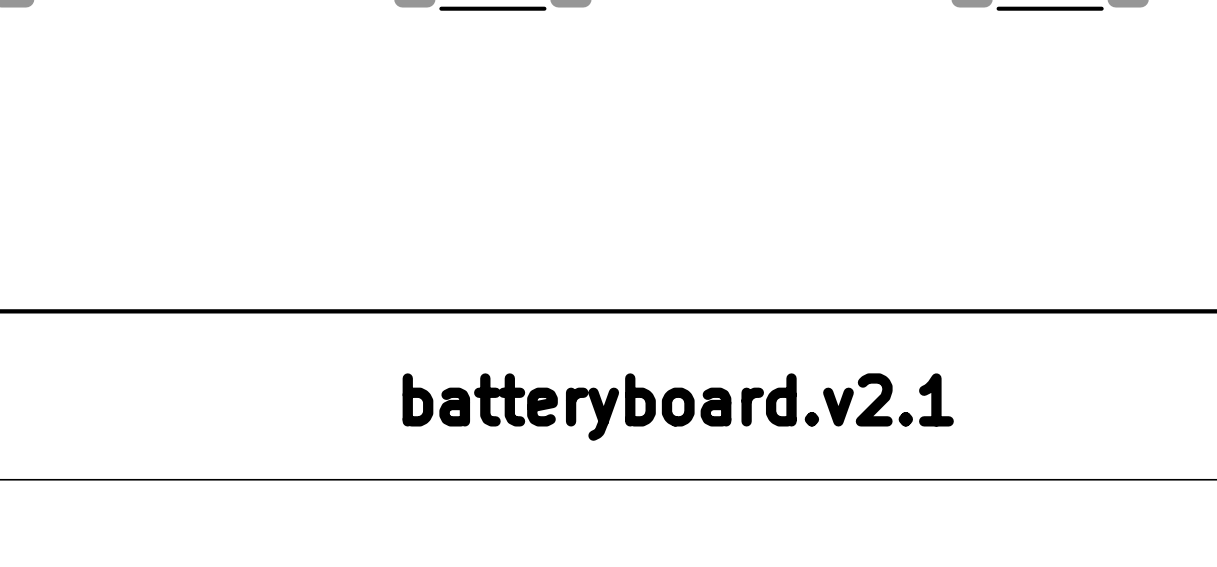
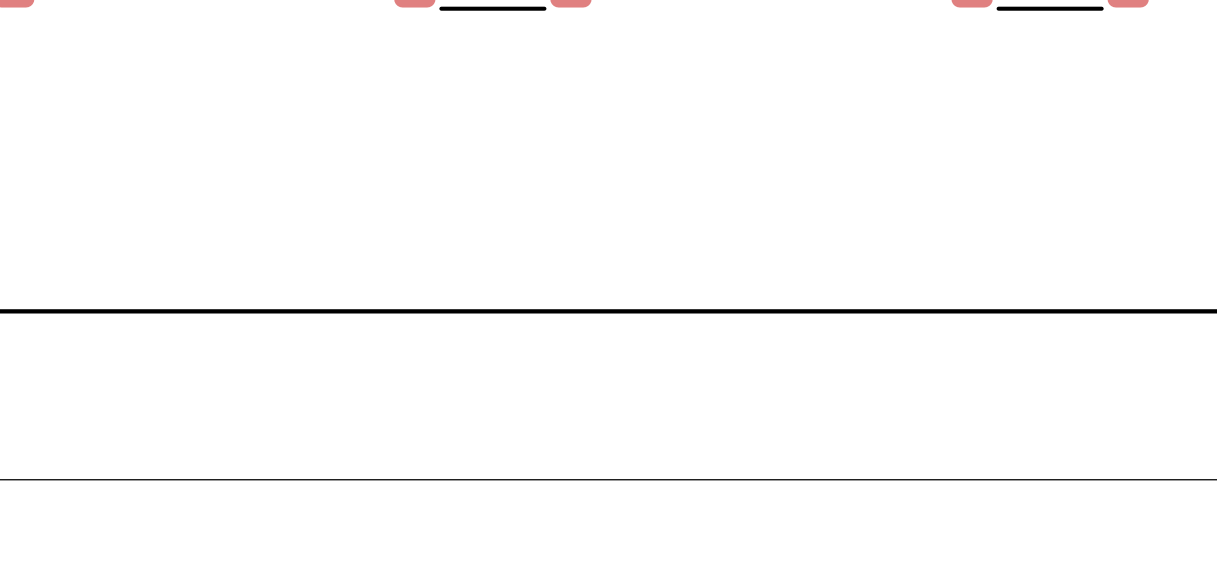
text: batteryboard.v2.1 (678, 407) -> none

